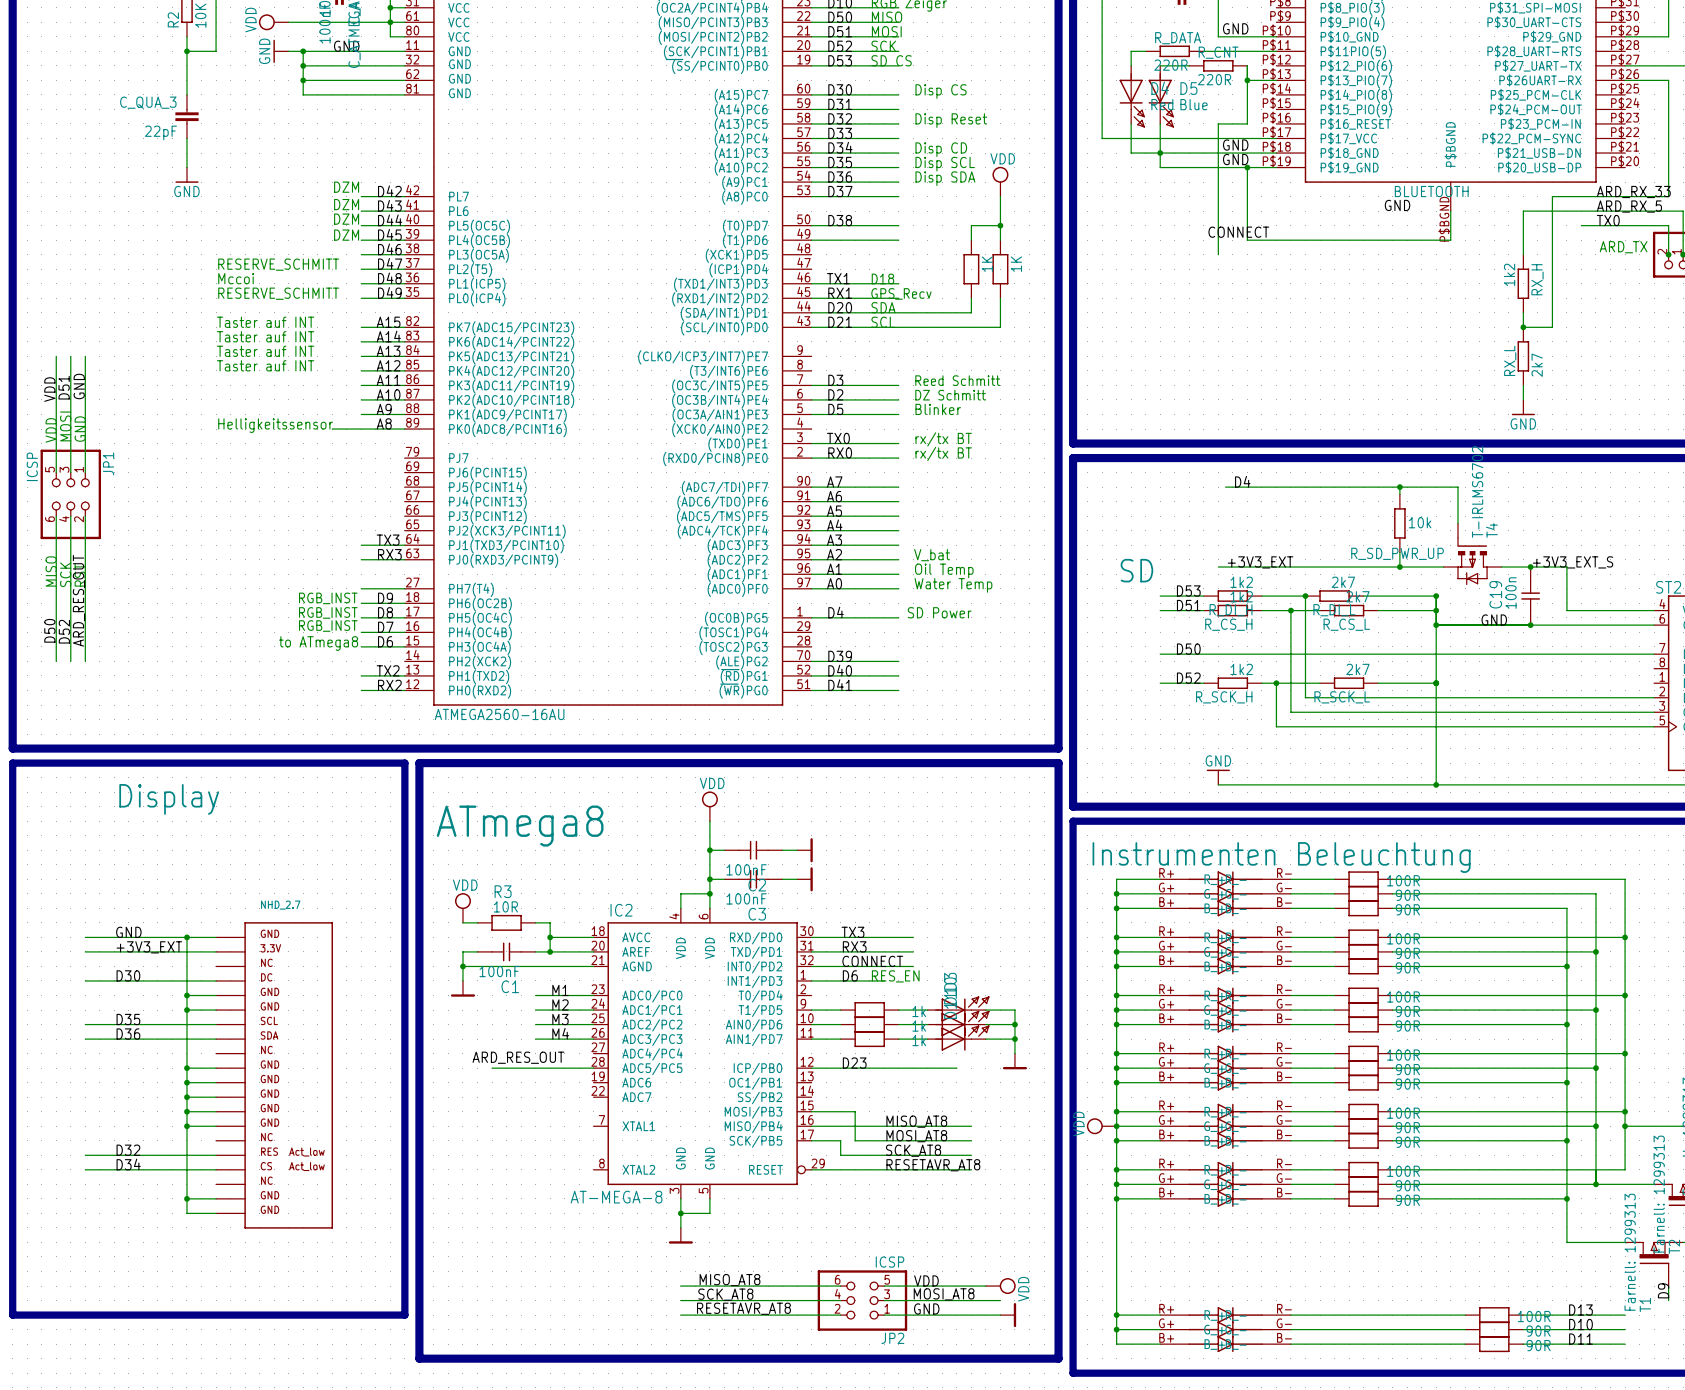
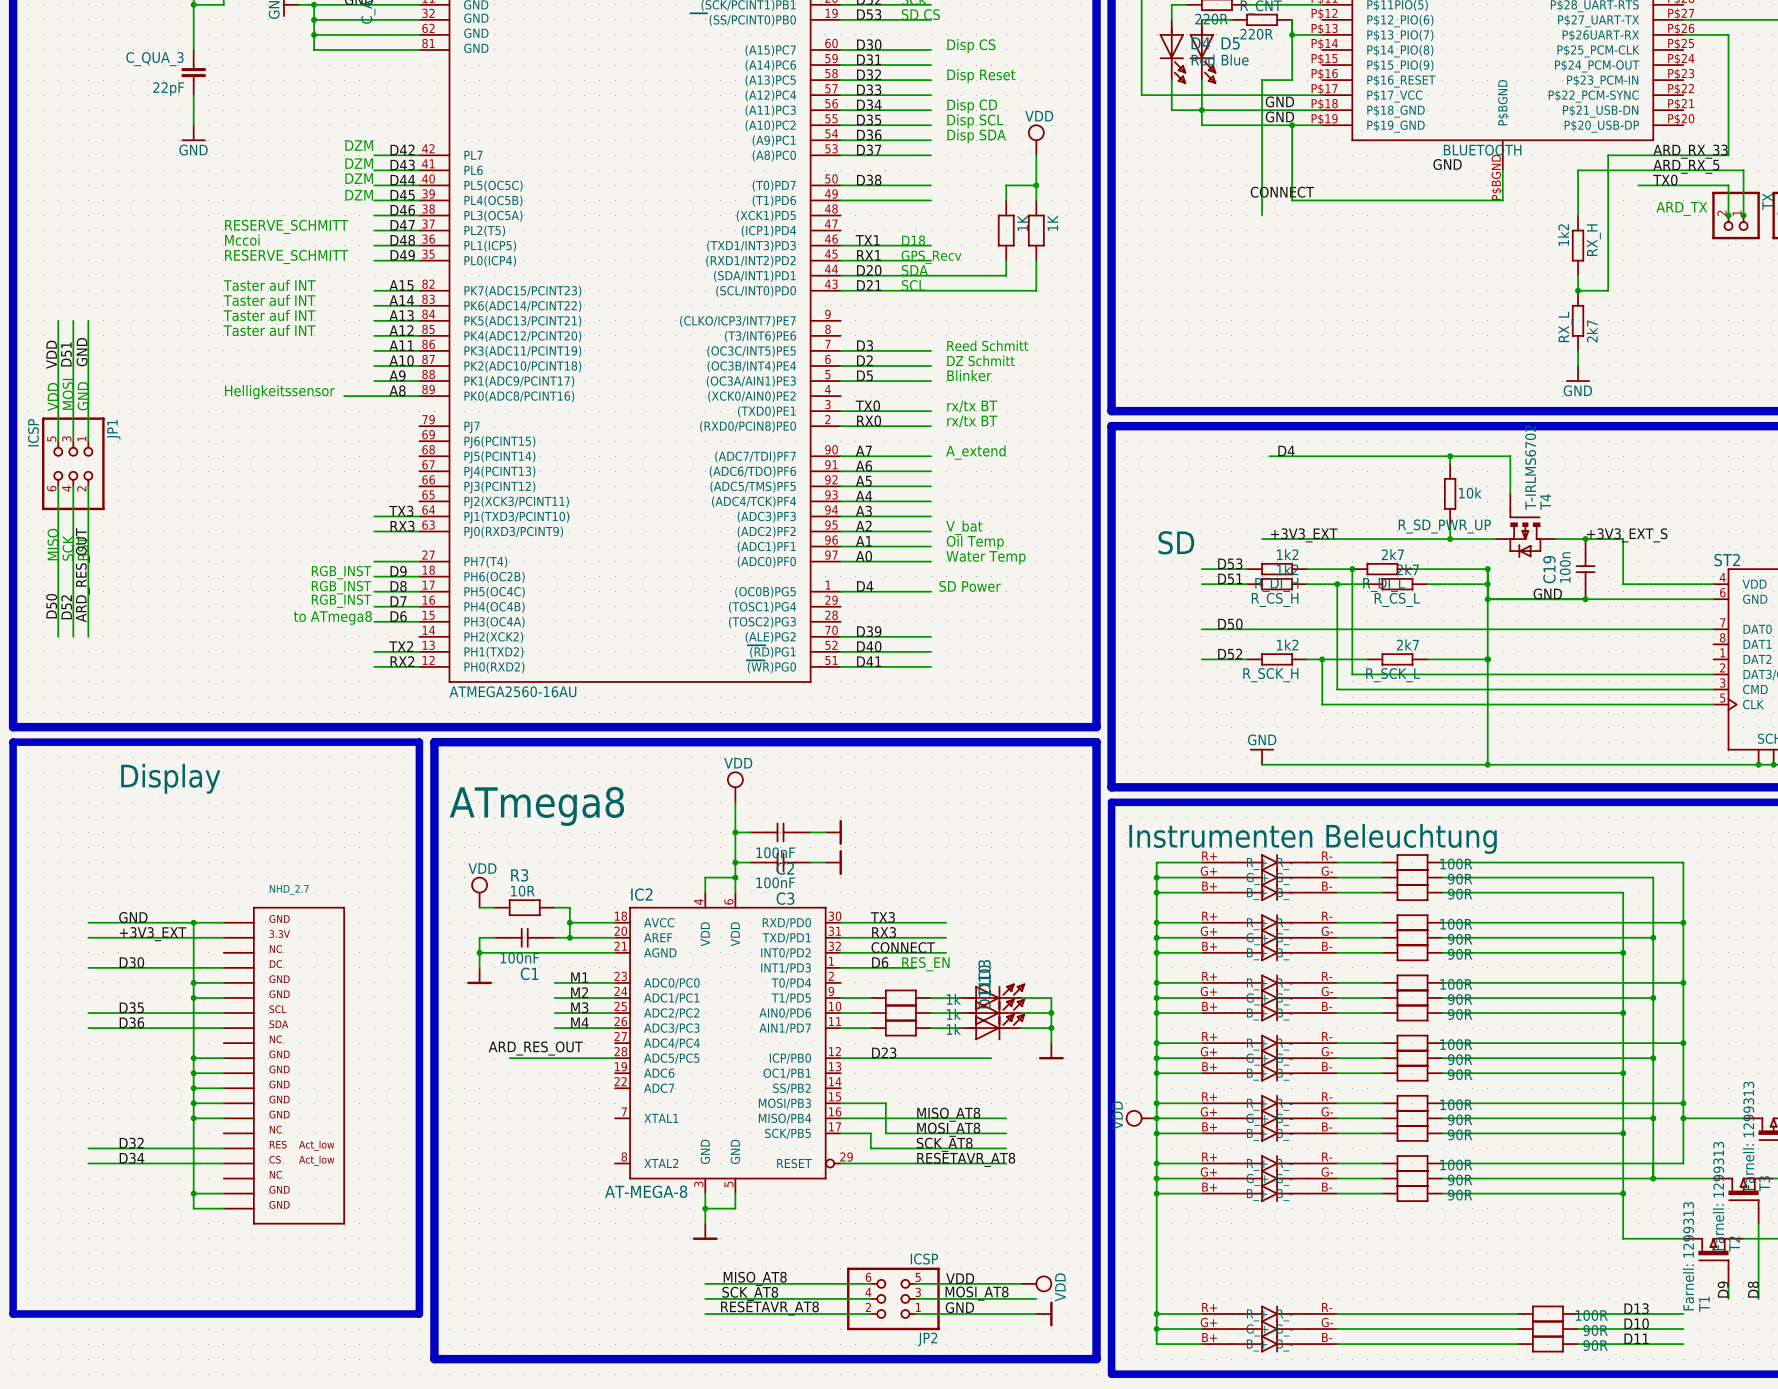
text: none -> A_extend (975, 452)

